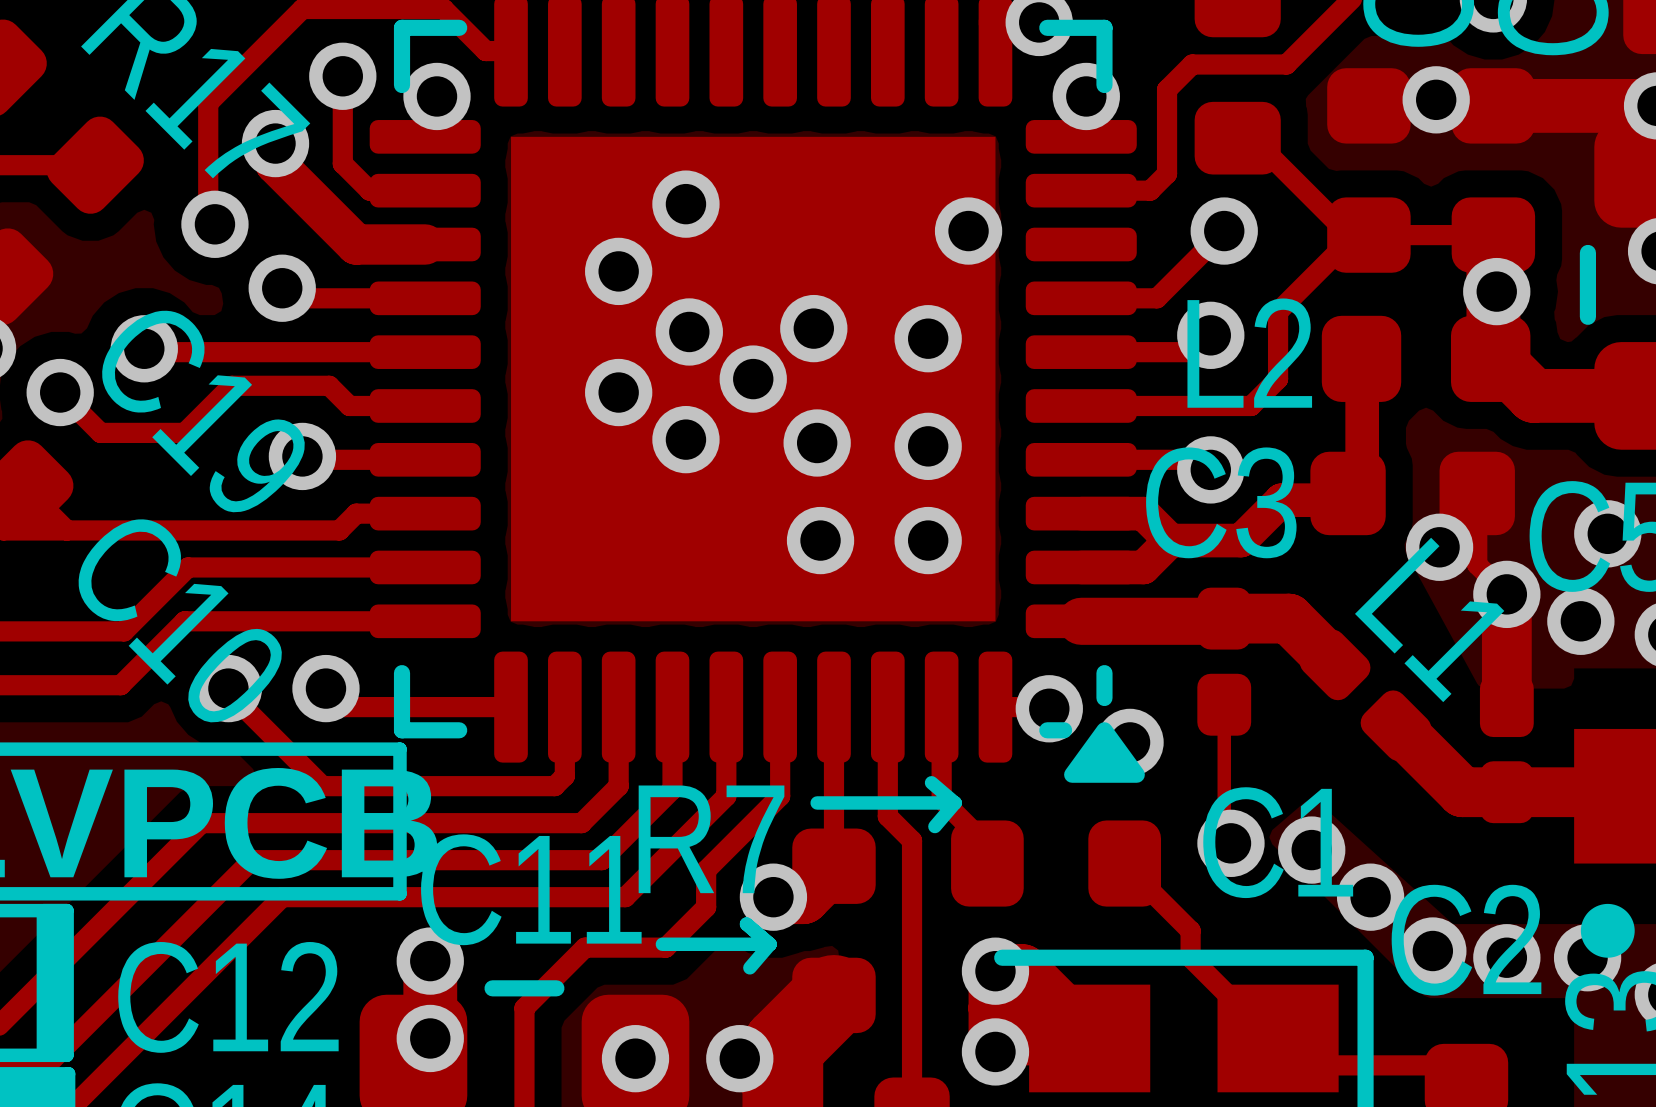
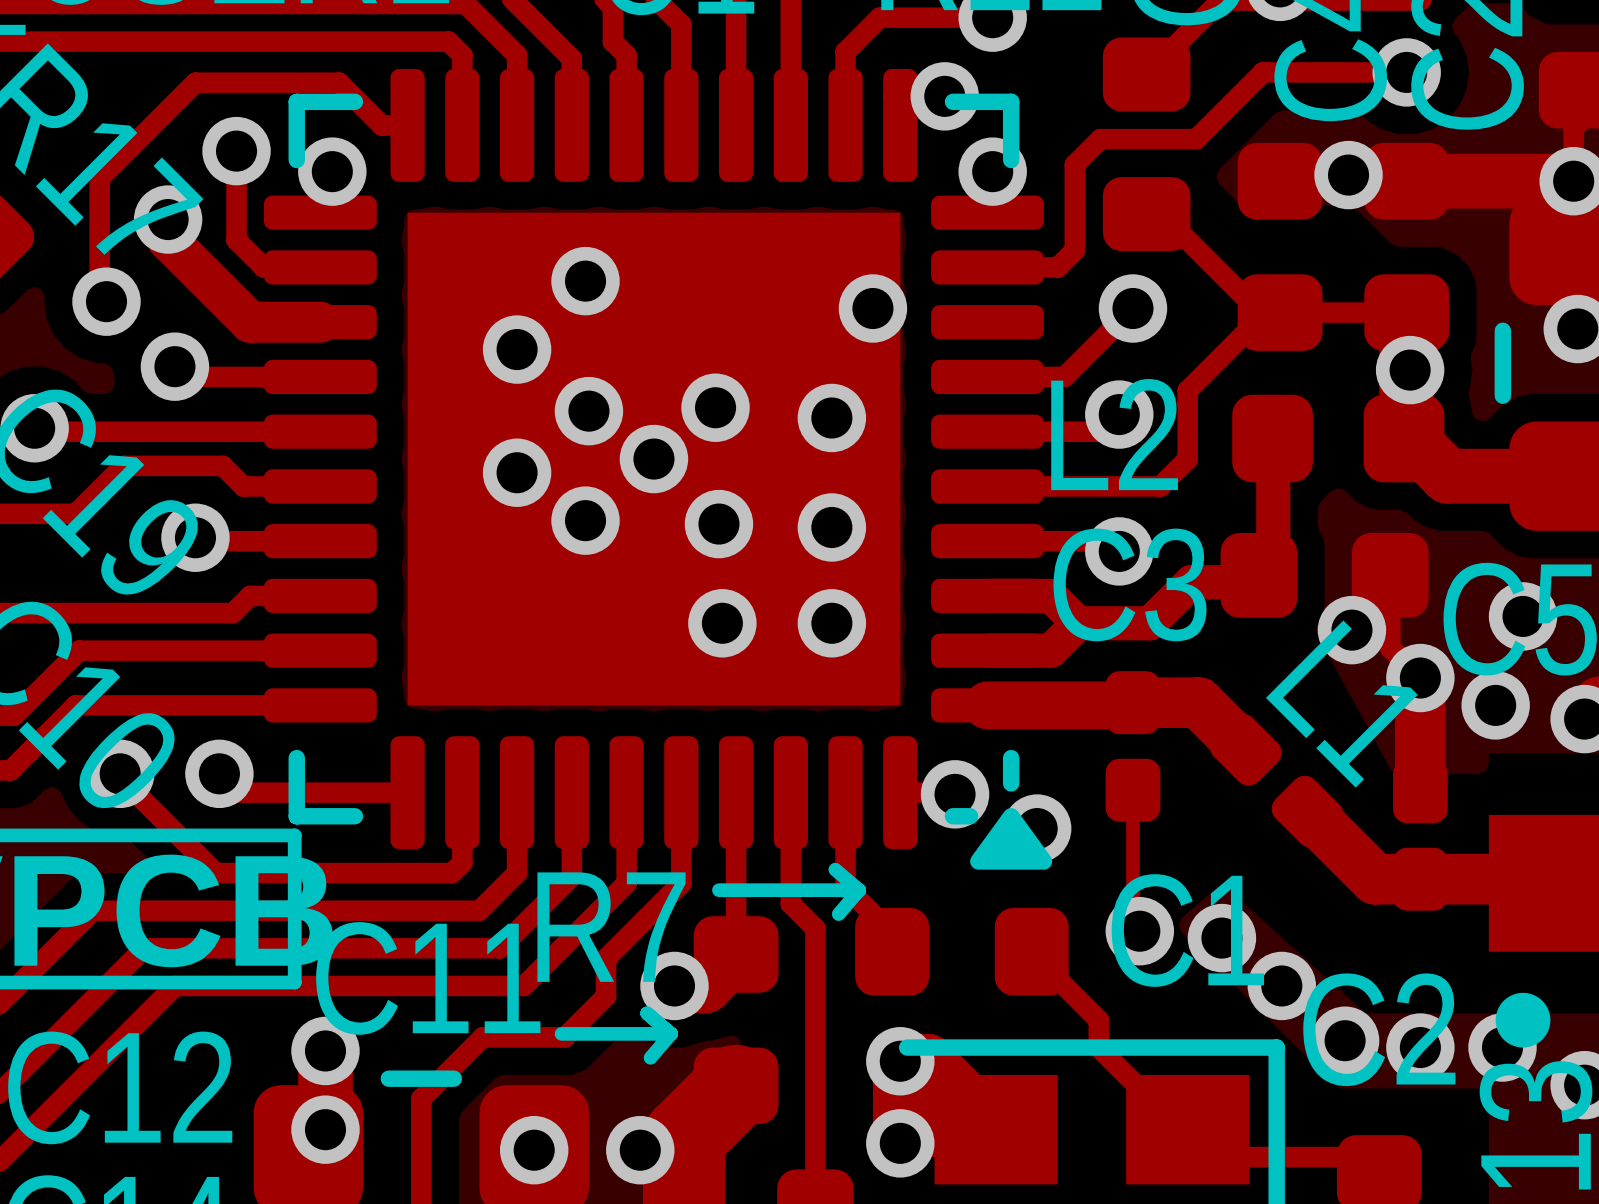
L2 name position: L2 (1249, 353) -> L2 (1114, 434)

